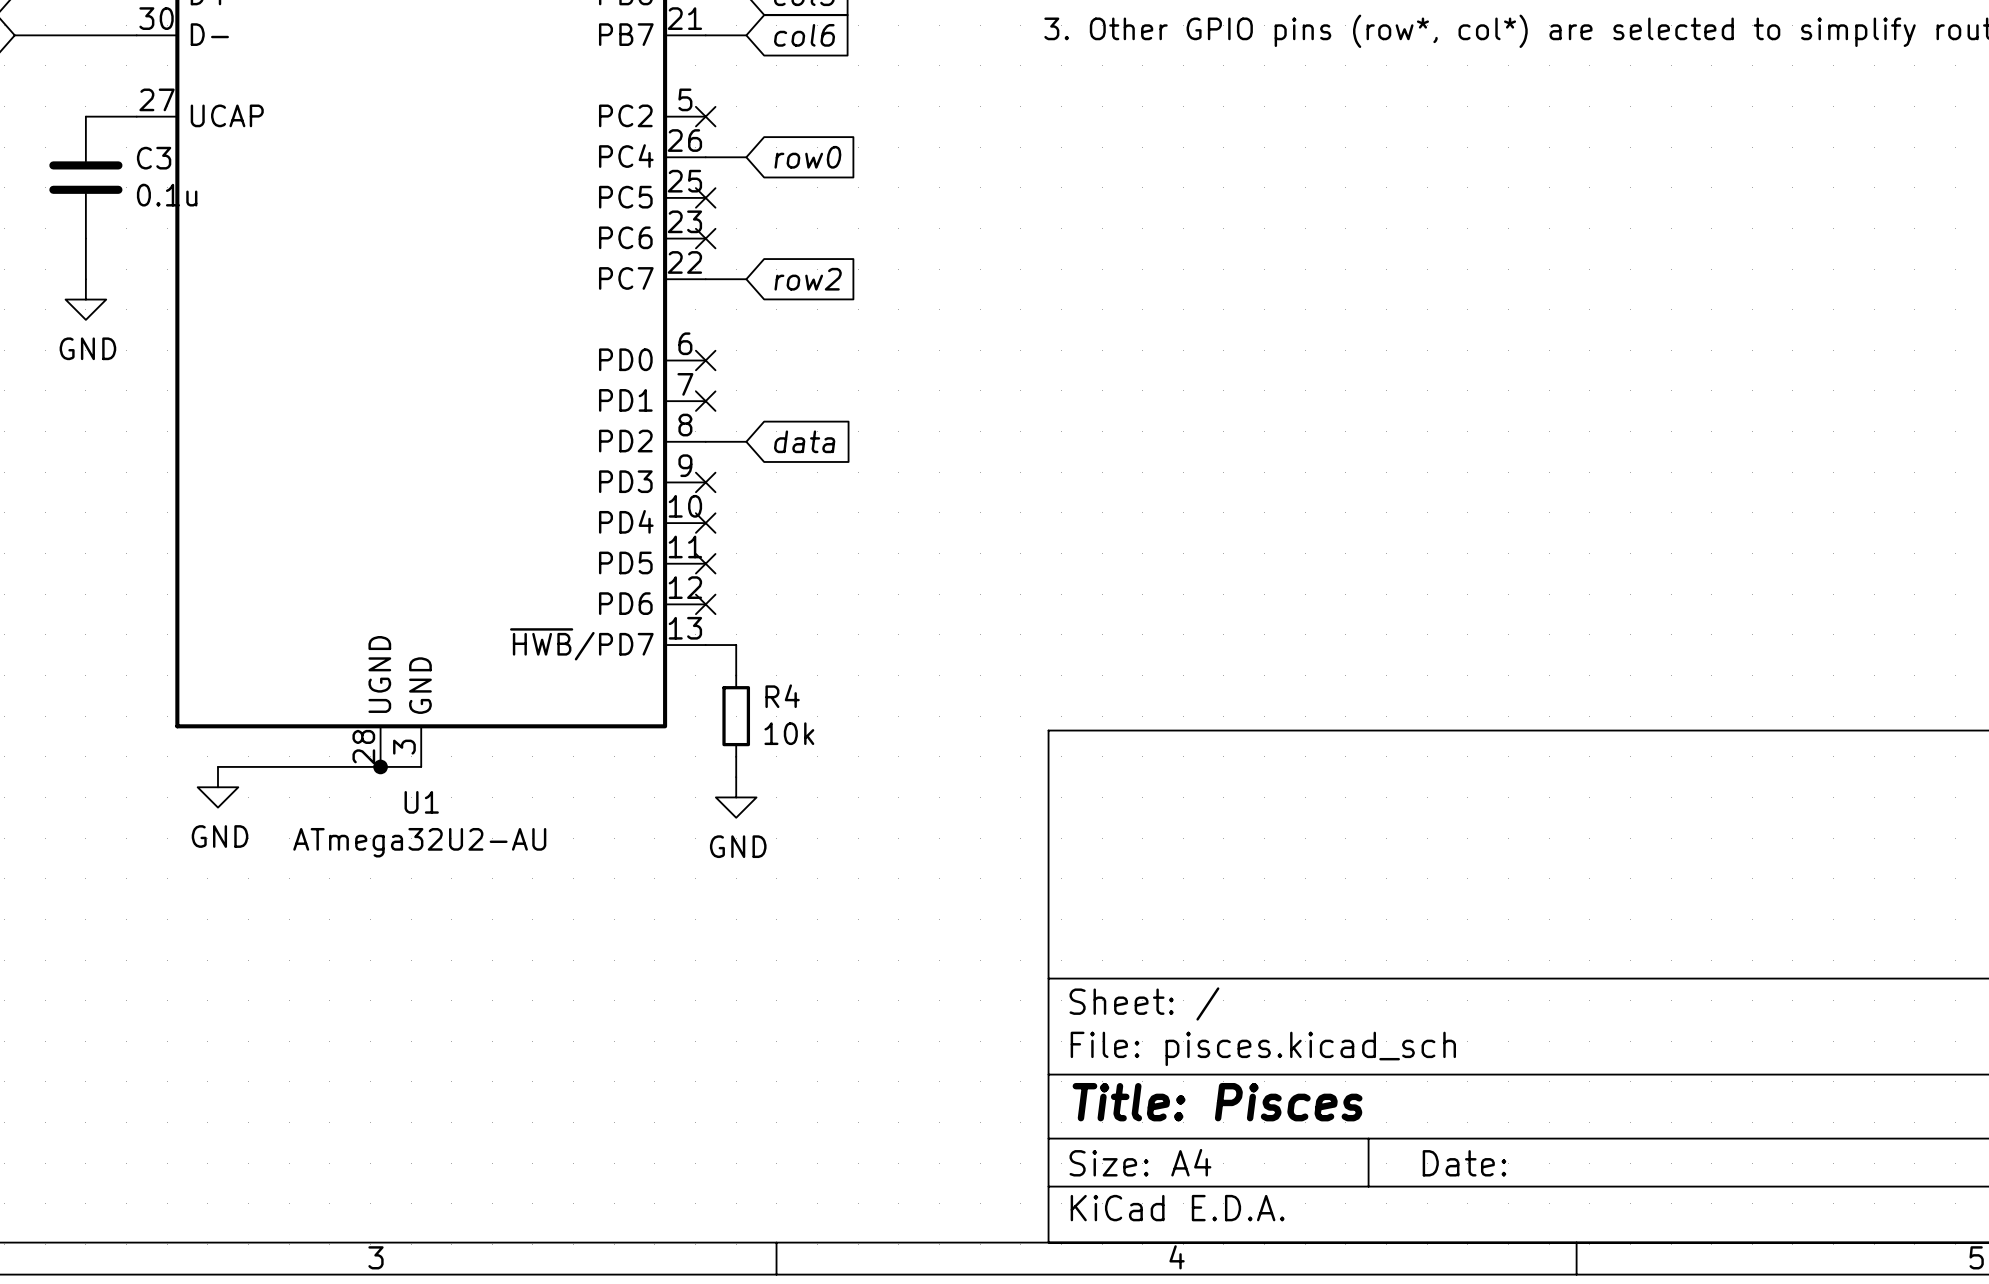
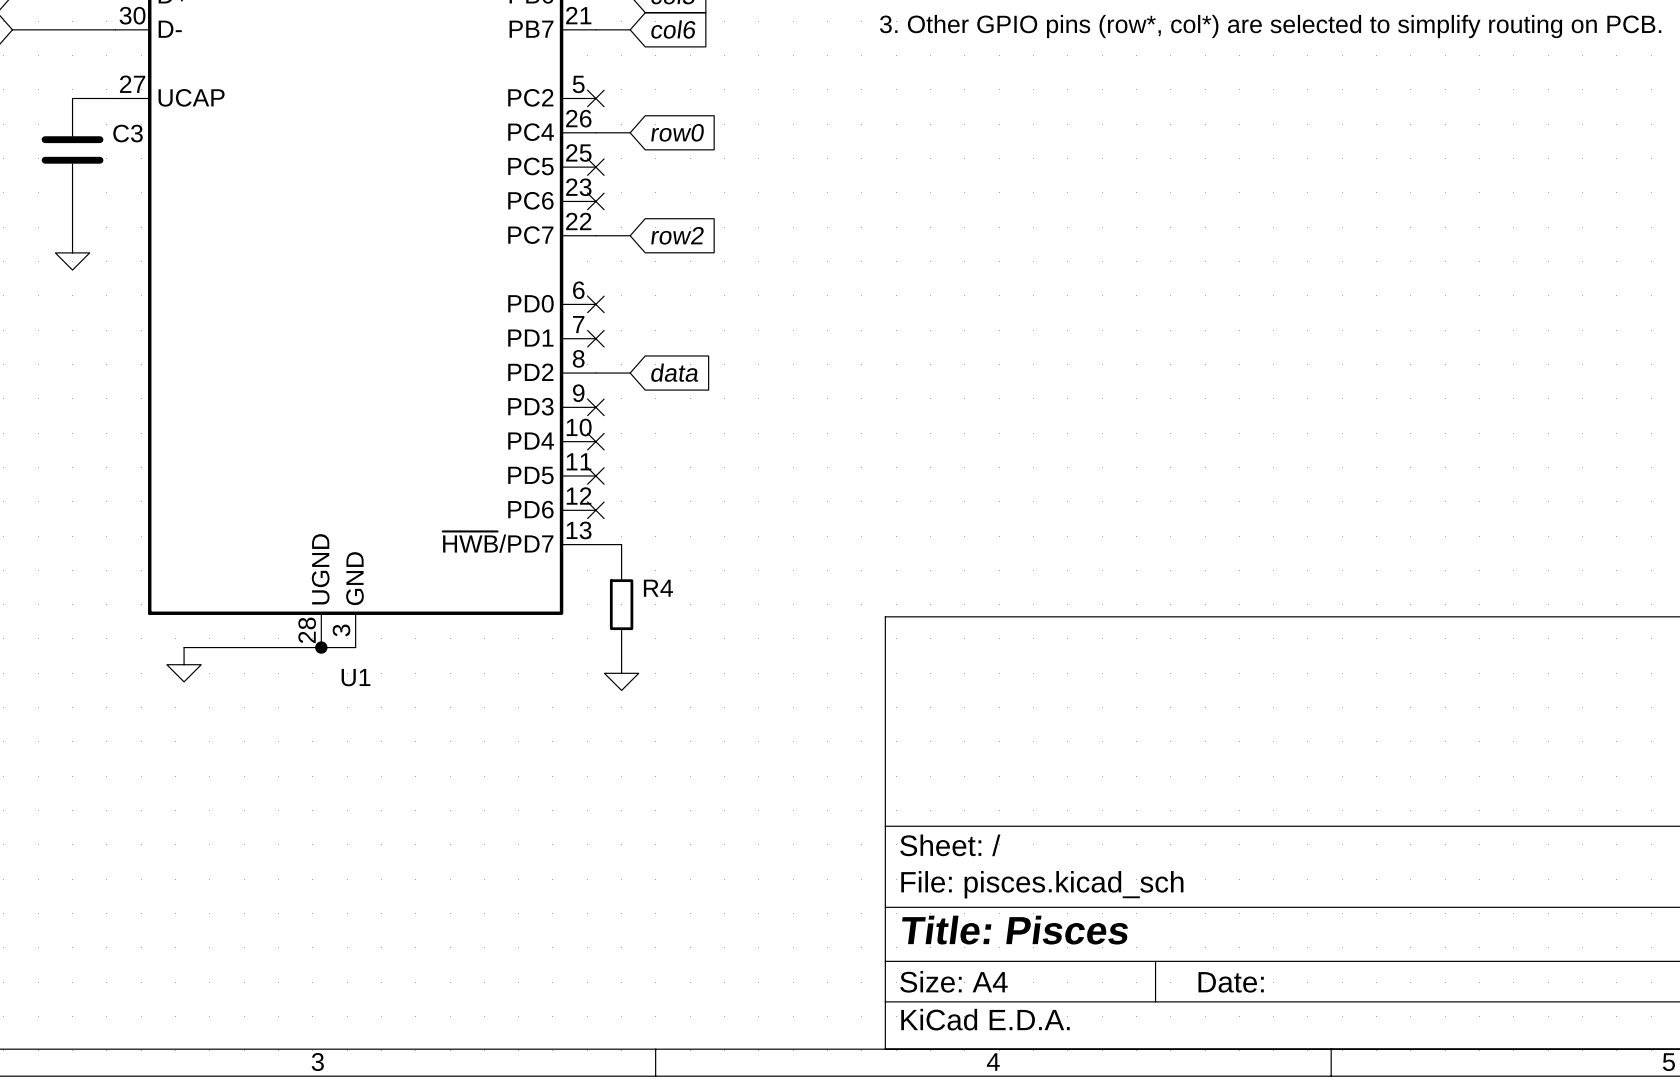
C3 value: 0.1u (167, 195) -> none
power symbol text: GND (87, 348) -> none
R4 value: 10k (789, 733) -> none
power symbol text: GND (220, 836) -> none
U1 value: ATmega32U2-AU (419, 842) -> none
power symbol text: GND (738, 846) -> none

